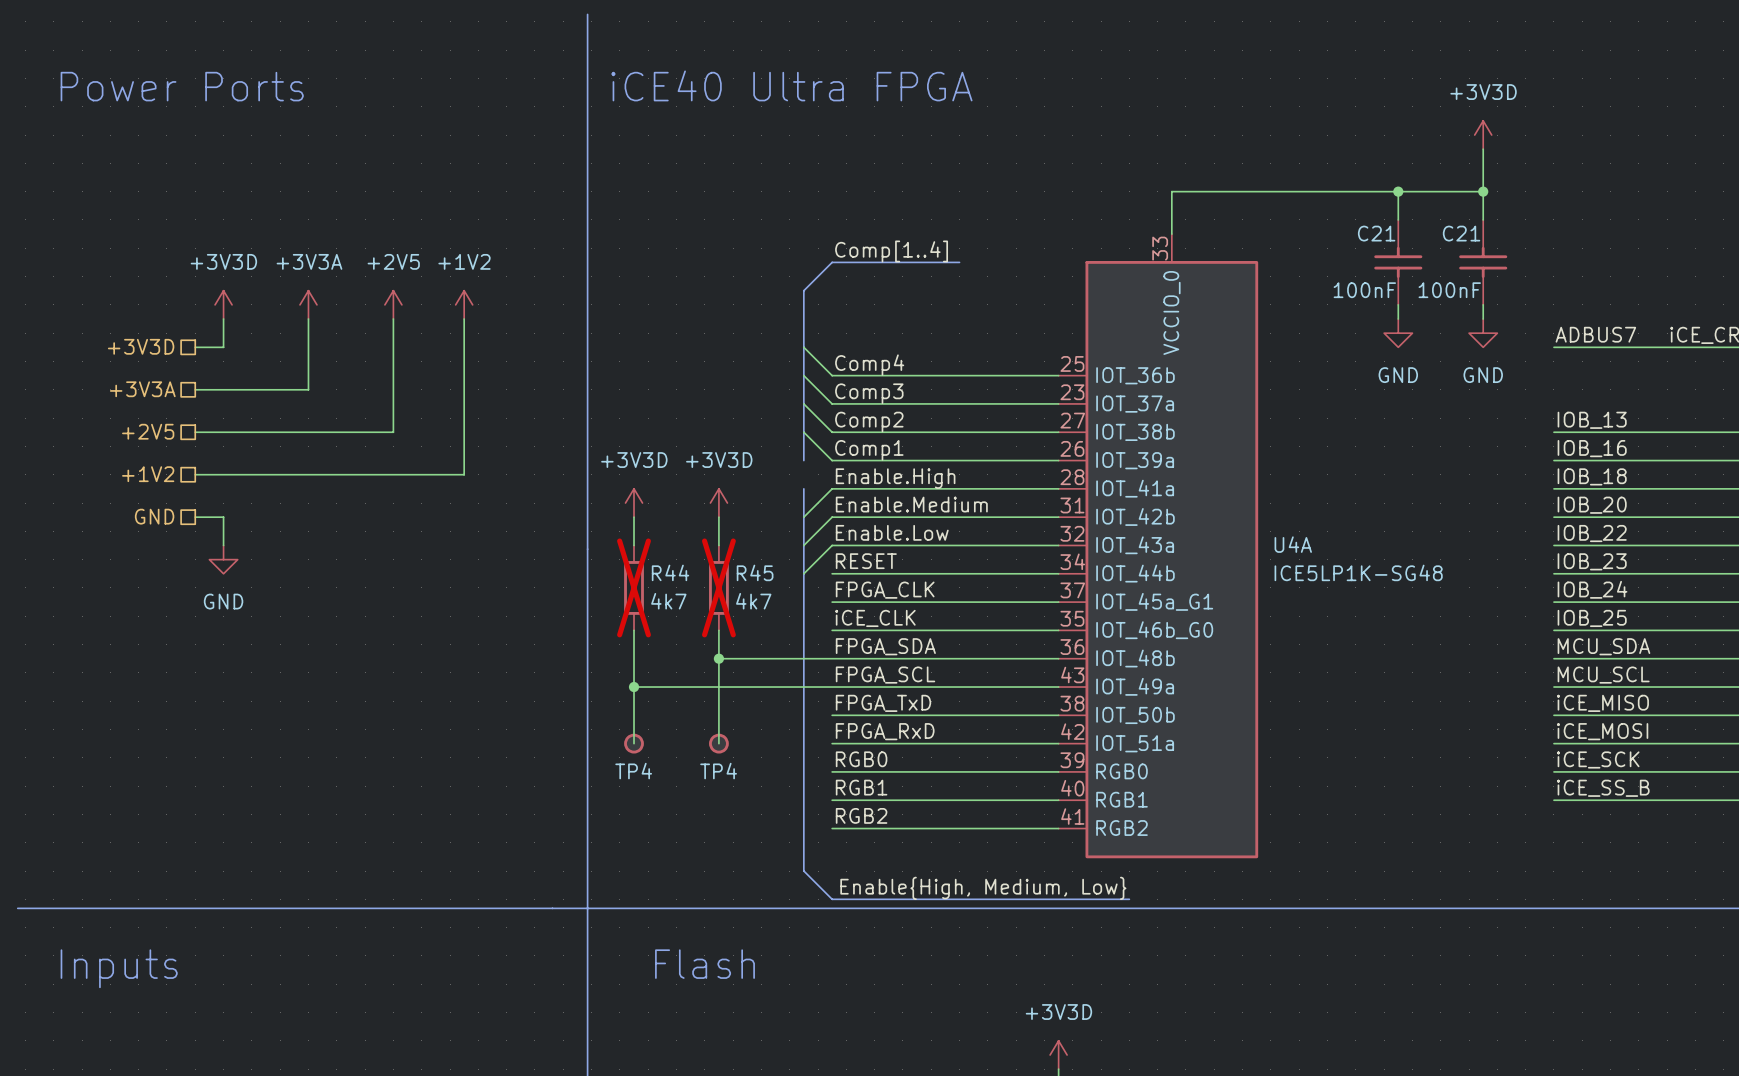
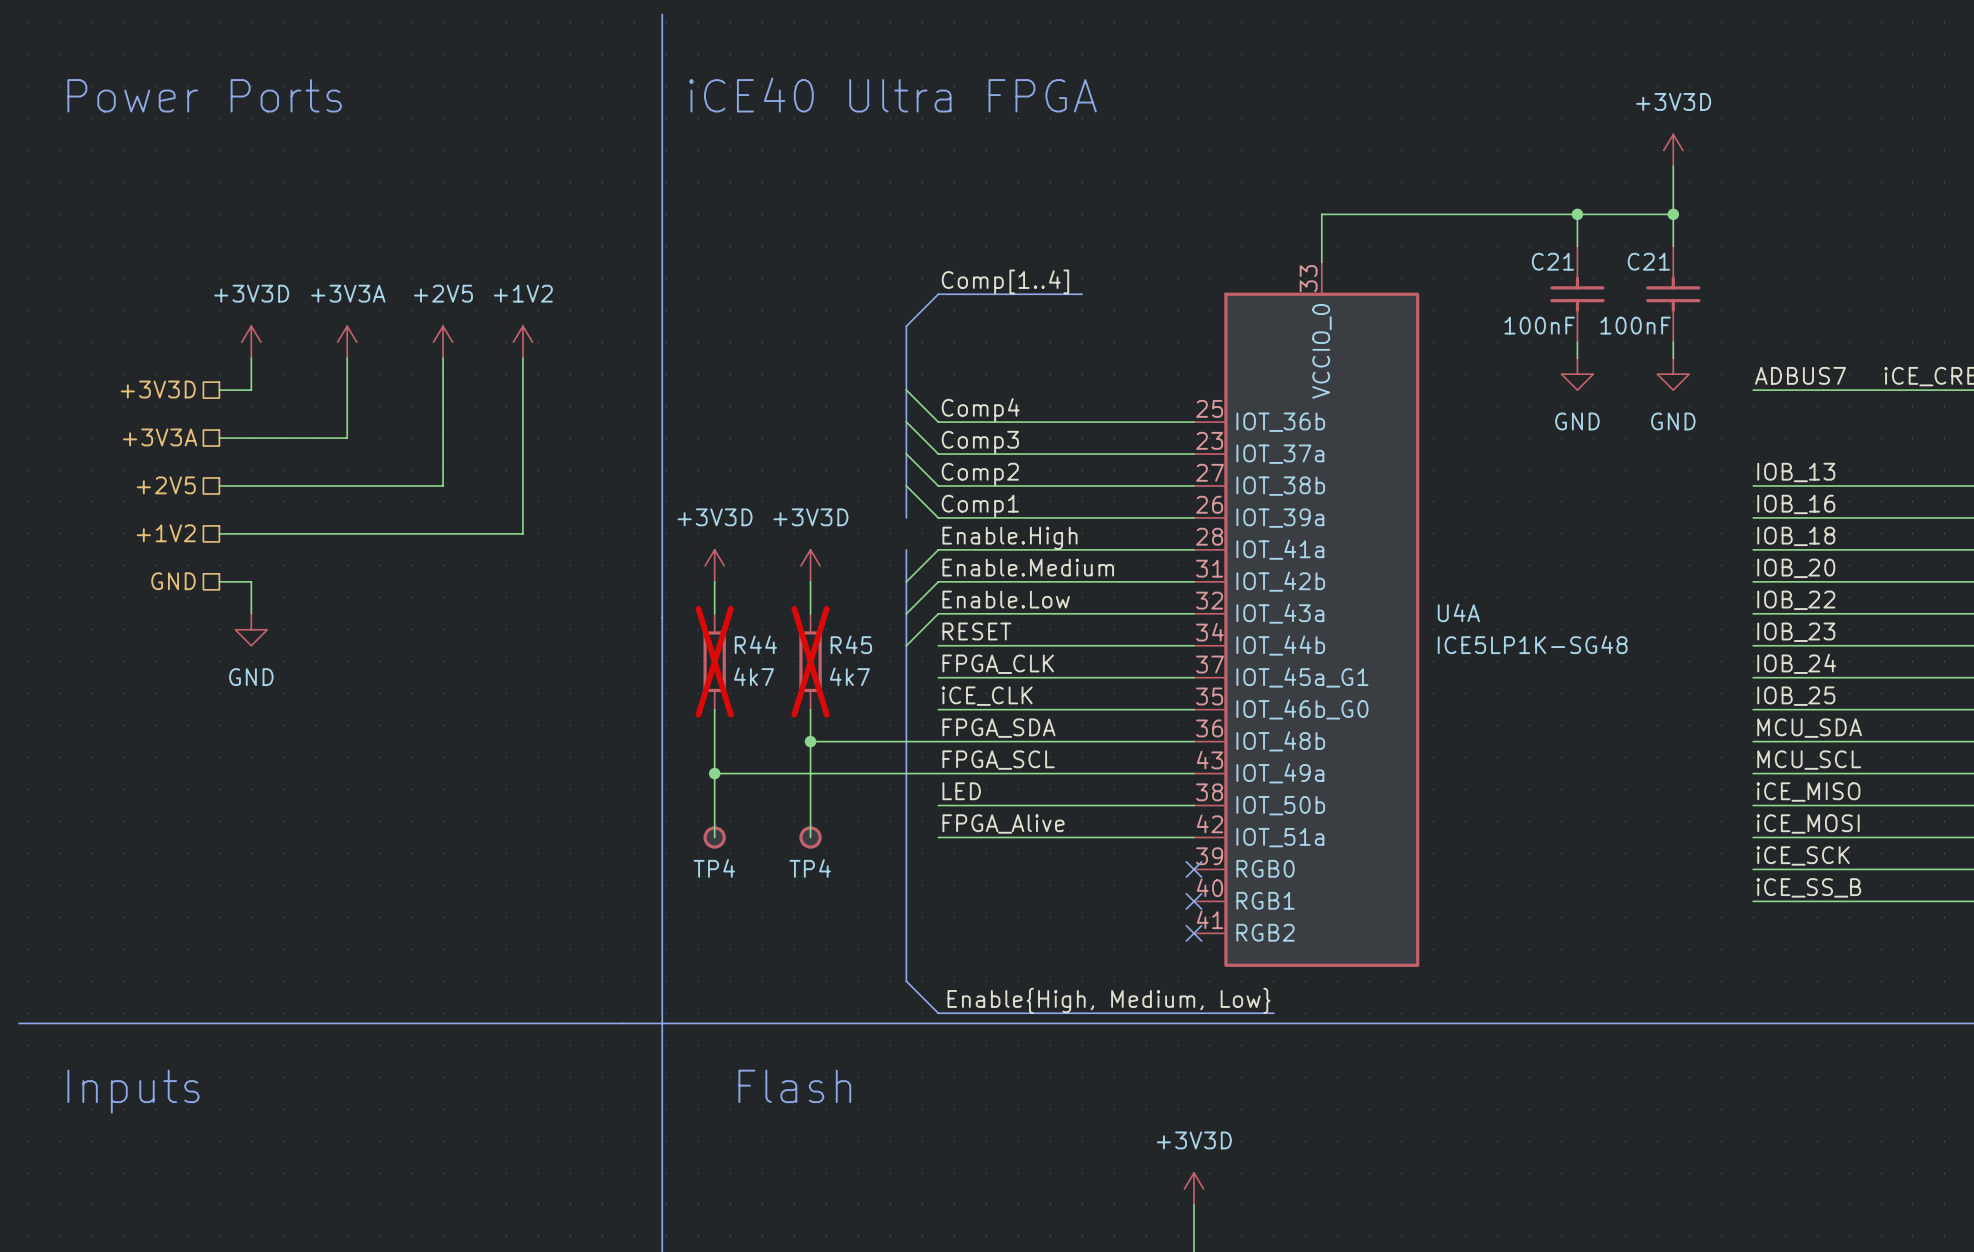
label: FPGA_TxD (883, 703) -> LED (961, 791)
label: FPGA_RxD (885, 731) -> FPGA_Alive (1003, 823)
label: RGB0 (861, 759) -> none
wire: (832, 771) (1058, 771) -> none
no-connect mark: none -> (1193, 869)
label: RGB1 (861, 787) -> none
wire: (832, 800) (1058, 800) -> none
no-connect mark: none -> (1193, 901)
label: RGB2 (861, 815) -> none
wire: (832, 828) (1058, 828) -> none
no-connect mark: none -> (1193, 933)

